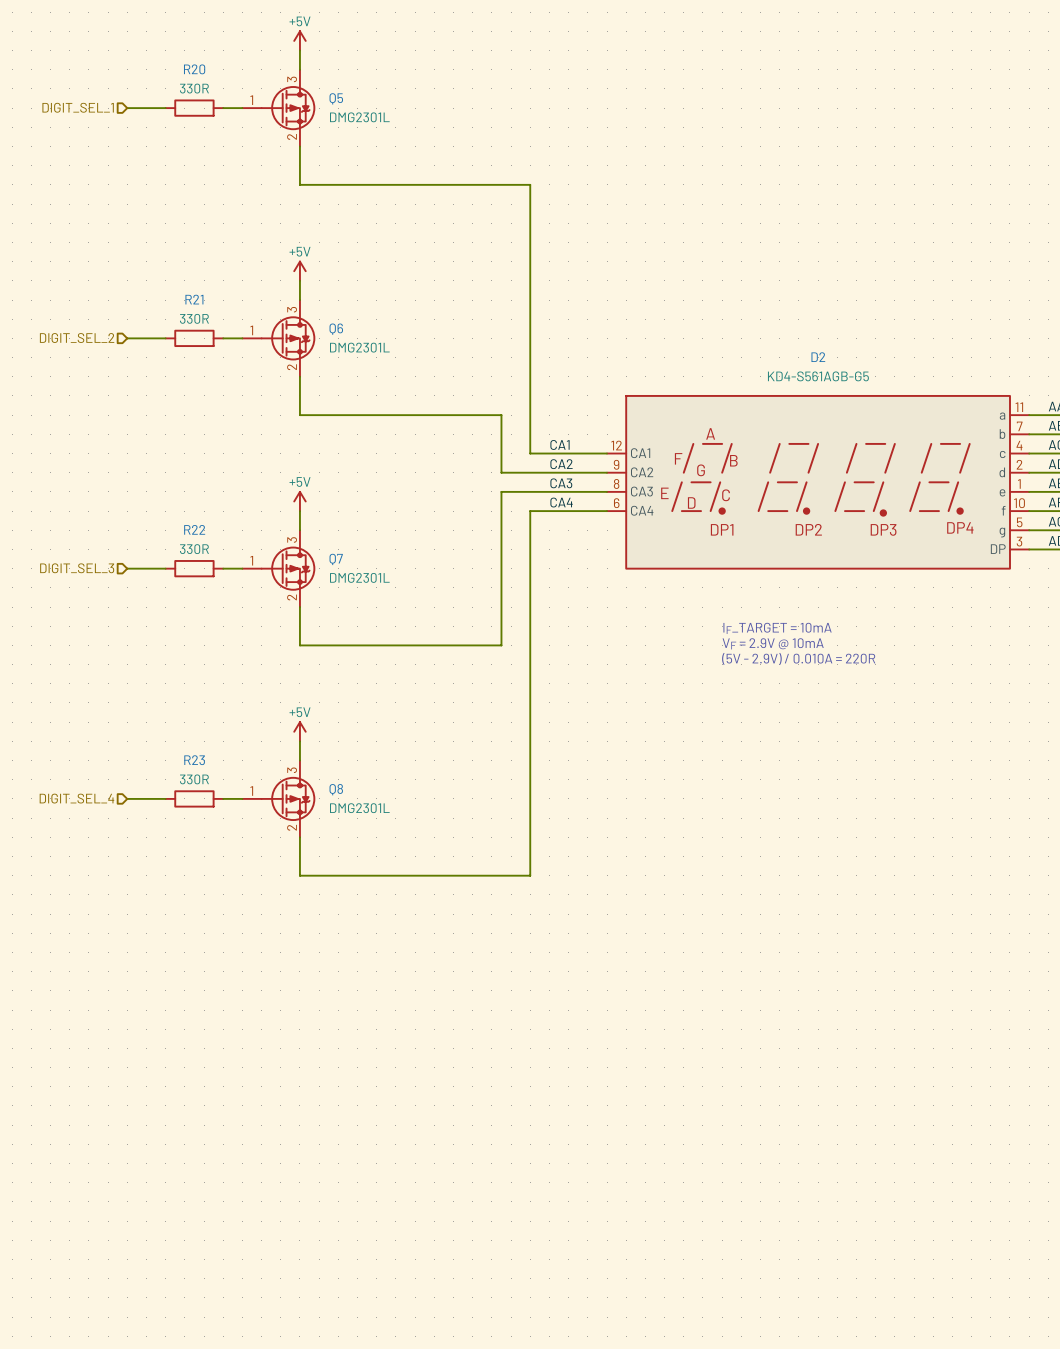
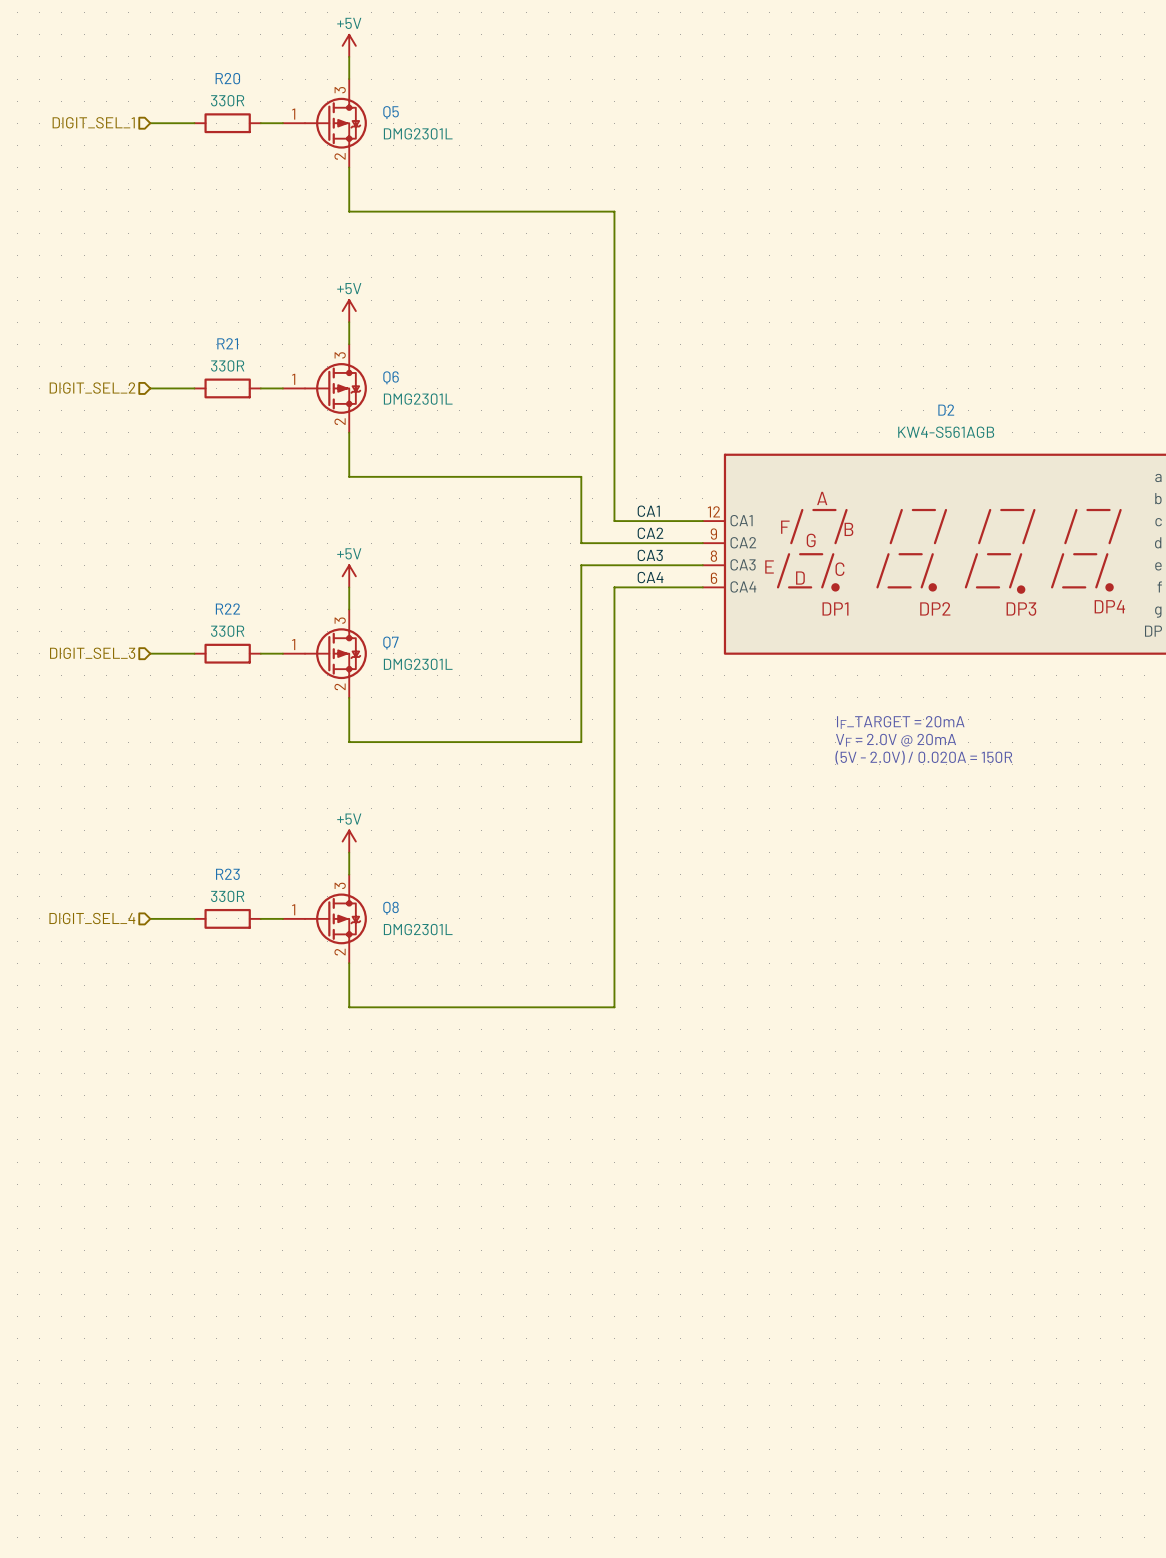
D2 value: KD4-S561AGB-G5 (818, 376) -> KW4-S561AGB (946, 432)
text: IF_TARGET = 10mA (777, 628) -> IF_TARGET = 20mA (900, 722)
text: VF = 2.9V @ 10mA (773, 643) -> VF = 2.0V @ 20mA (896, 740)
text: (5V - 2.9V) / 0.010A = 220R (798, 658) -> (5V - 2.0V) / 0.020A = 150R (923, 757)

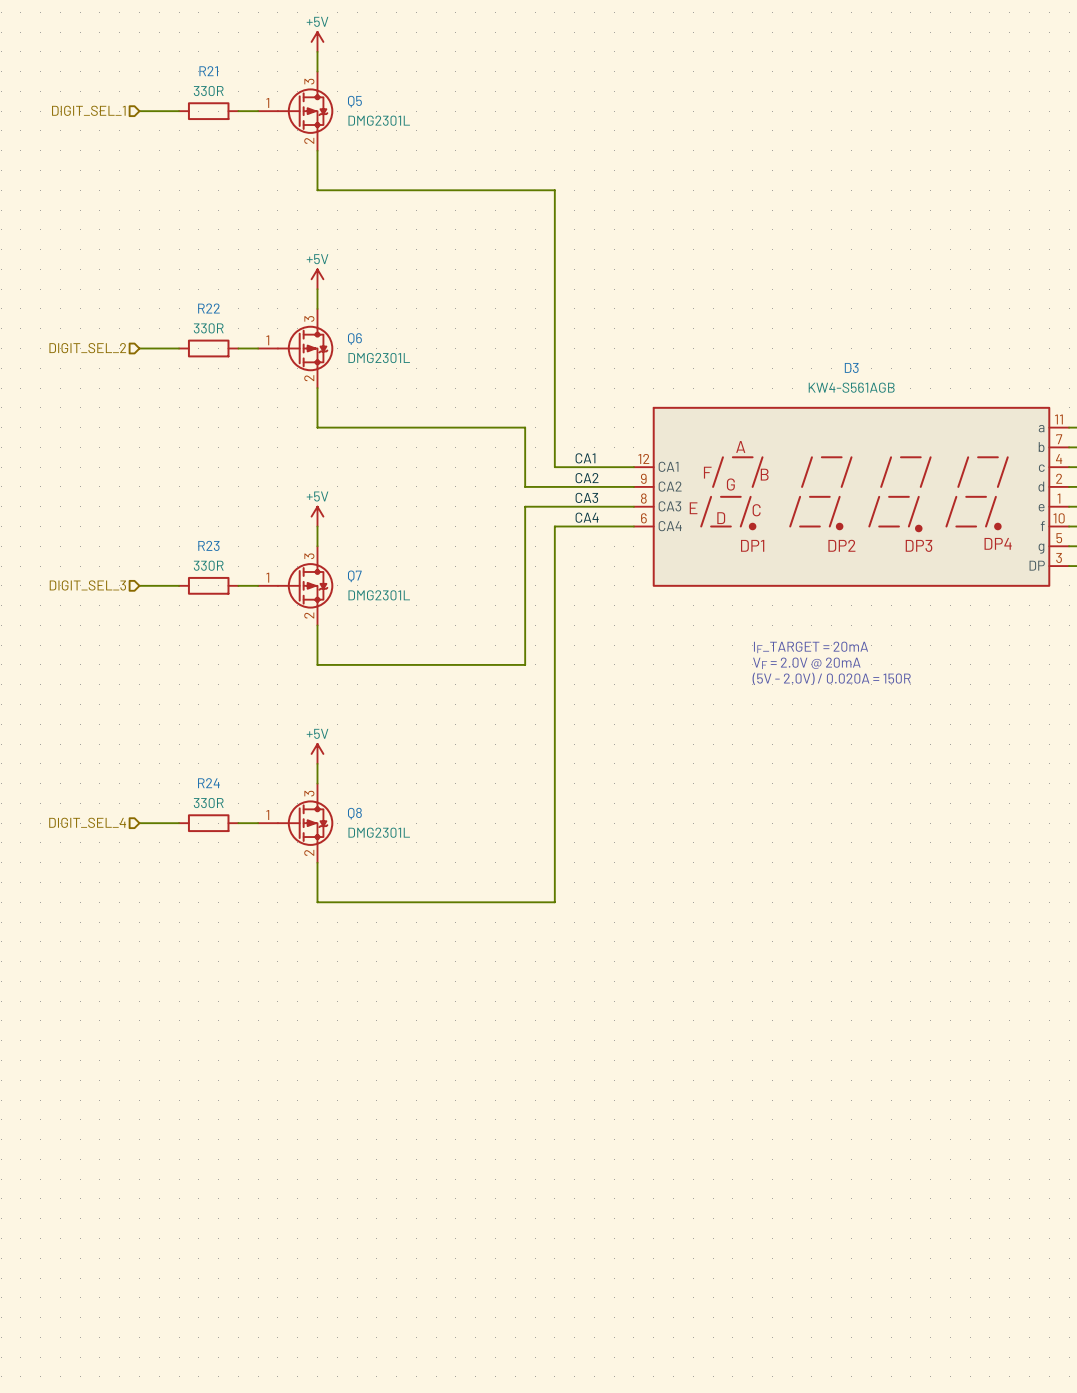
R20 name: R20 (227, 78) -> R21 (208, 71)
R21 name: R21 (227, 343) -> R22 (208, 308)
D2 name: D2 (946, 410) -> D3 (851, 367)
R22 name: R22 (227, 609) -> R23 (208, 545)
R23 name: R23 (227, 874) -> R24 (208, 783)

